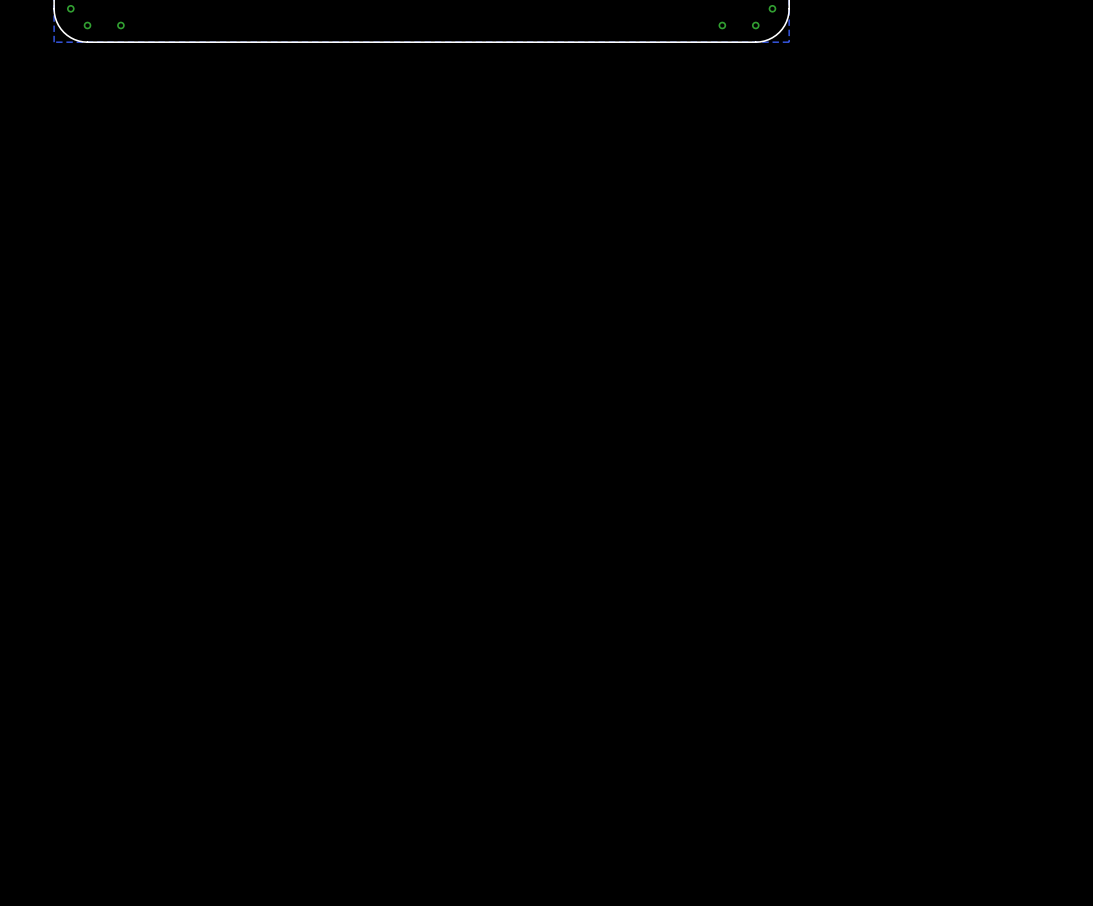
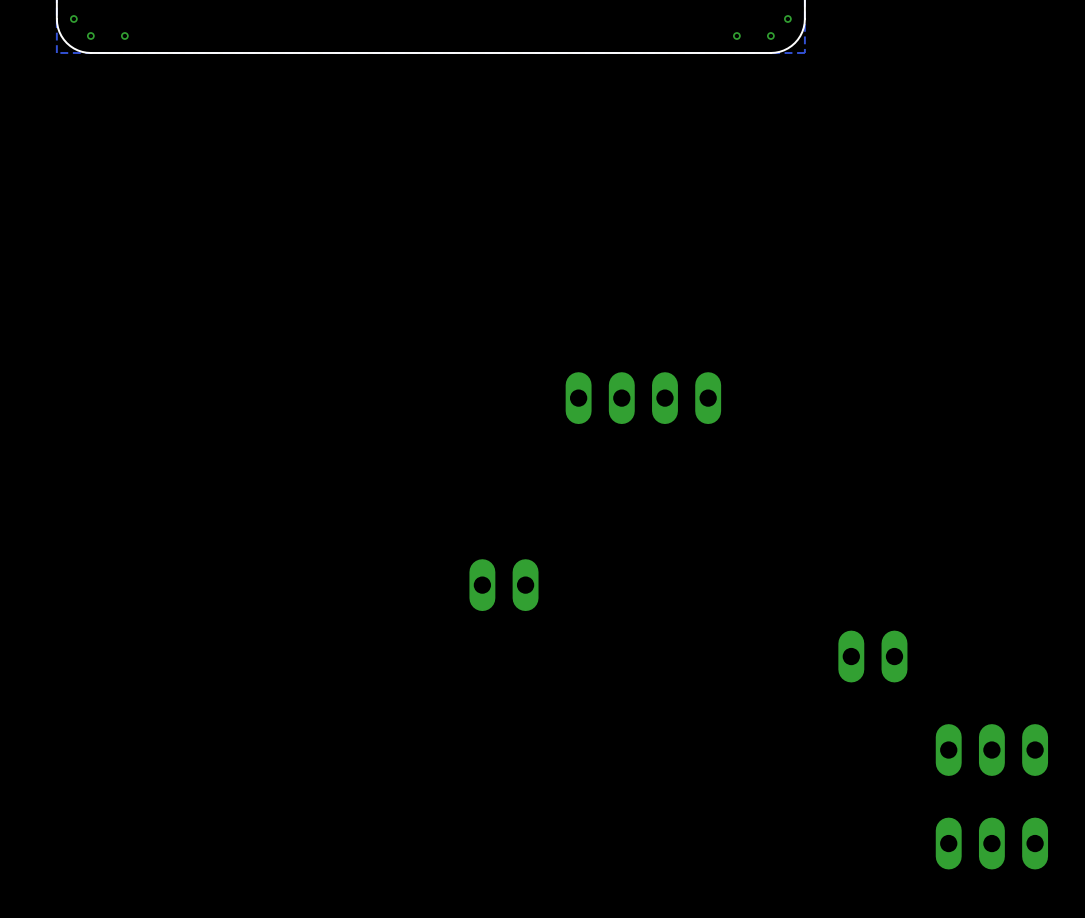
part: none -> (643, 398)
part: none -> (503, 585)
part: none -> (872, 656)
part: none -> (991, 750)
part: none -> (991, 843)

